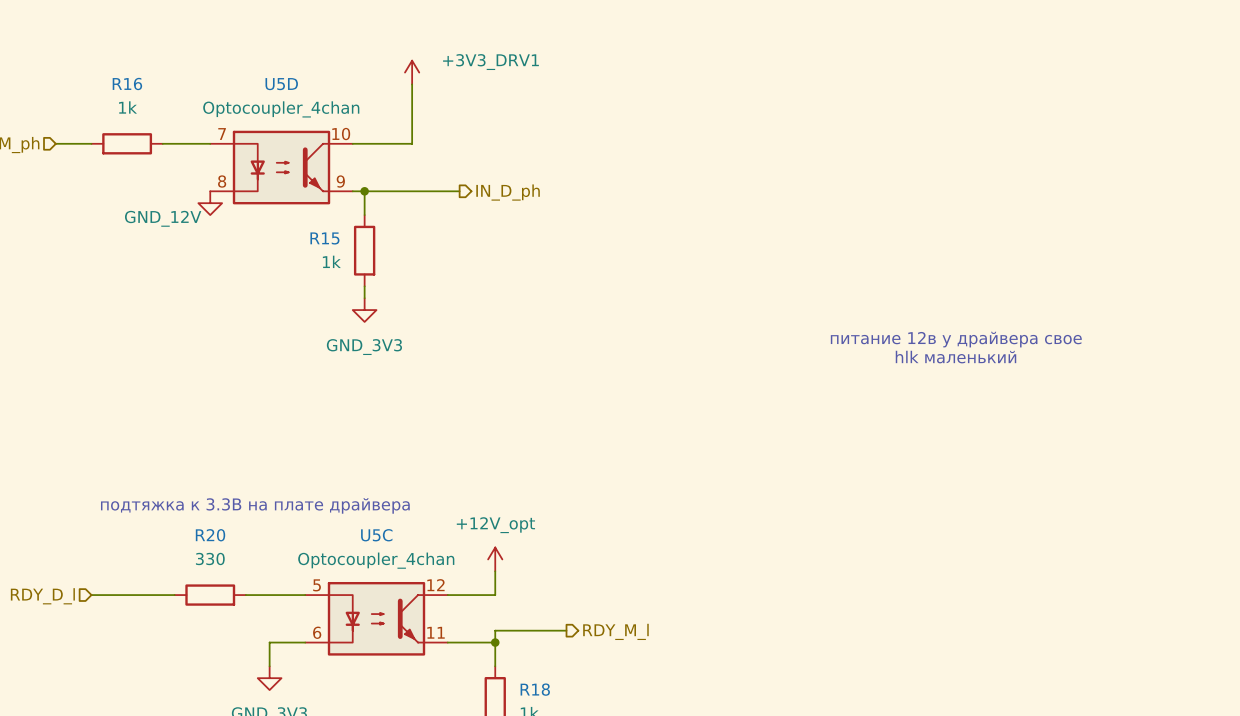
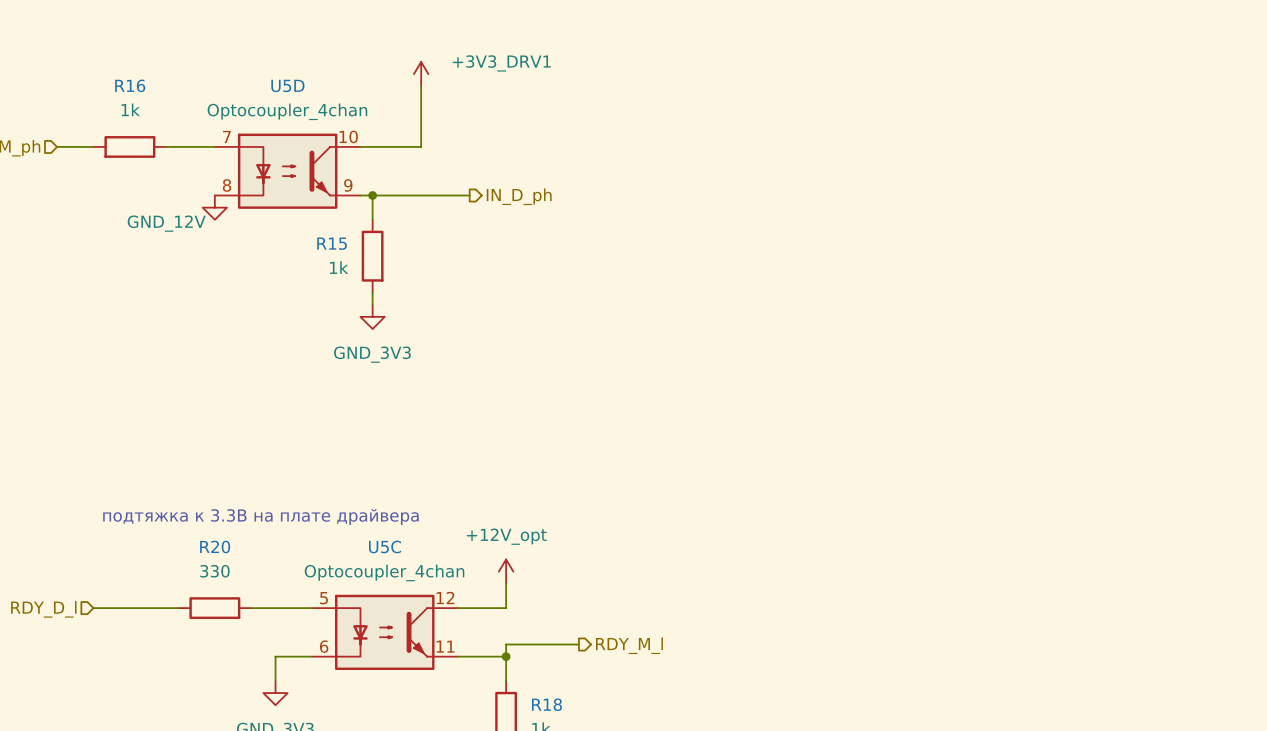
text: питание 12в у драйвера свое (956, 339) -> none
text: hlk маленький (956, 357) -> none

